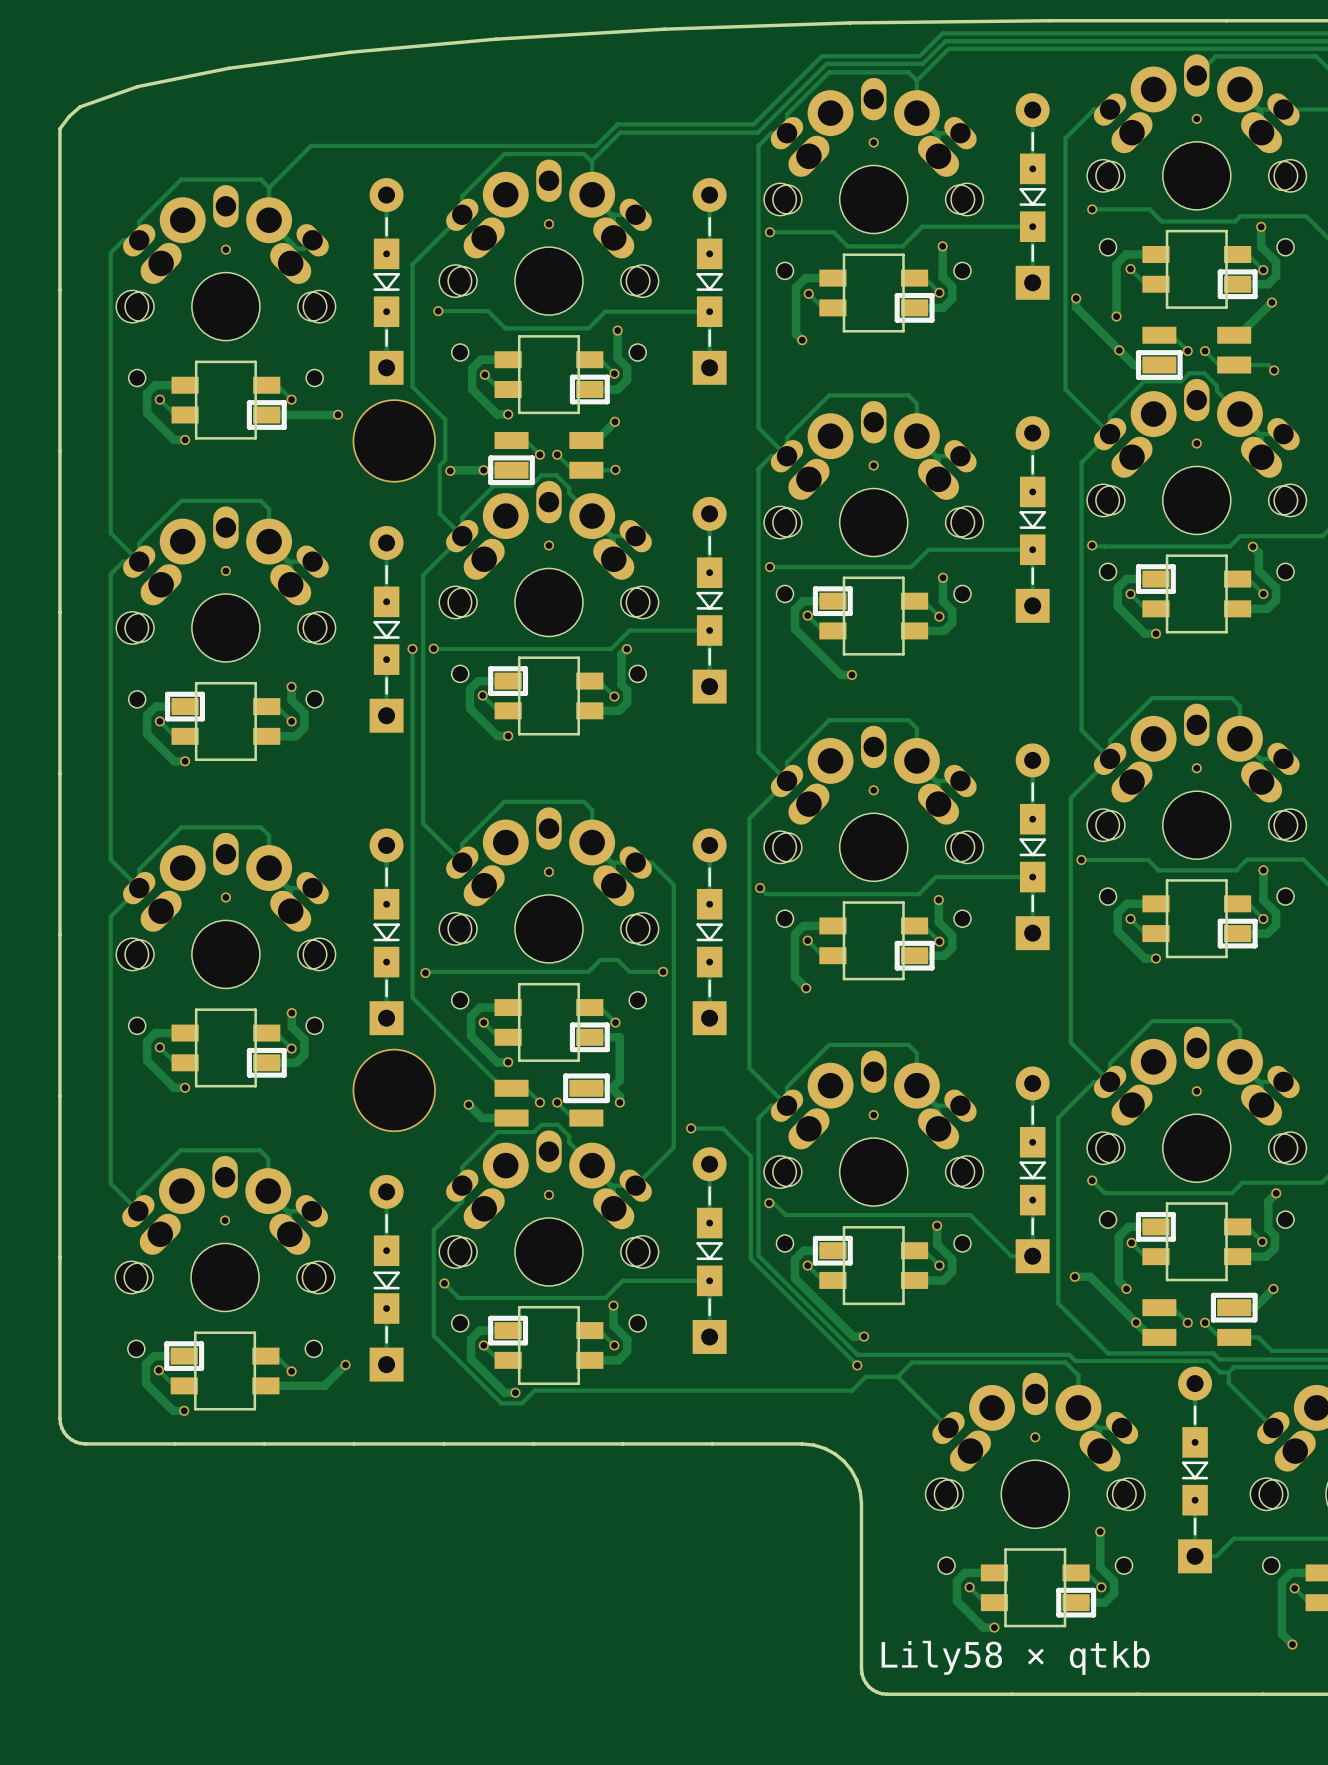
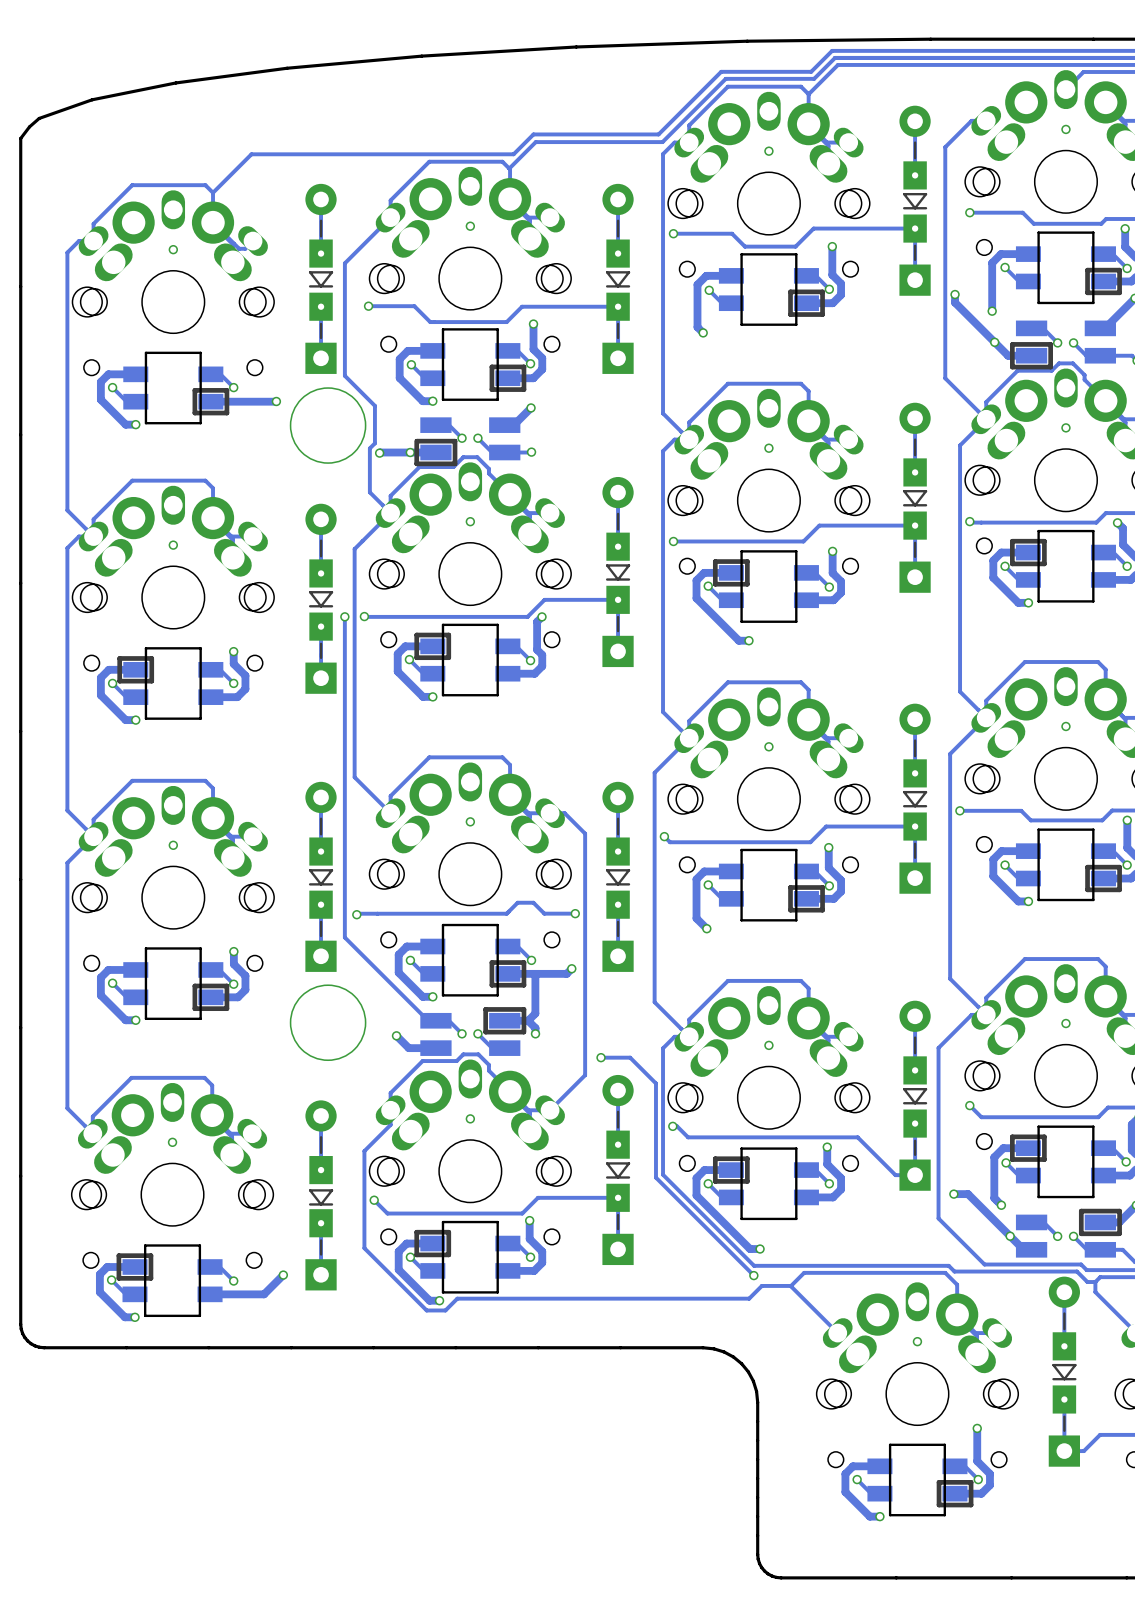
track: none -> (571, 968) (566, 973) (535, 973)
via: none -> (571, 968)
text: Lily58 × qtkb (1015, 1657) -> none

